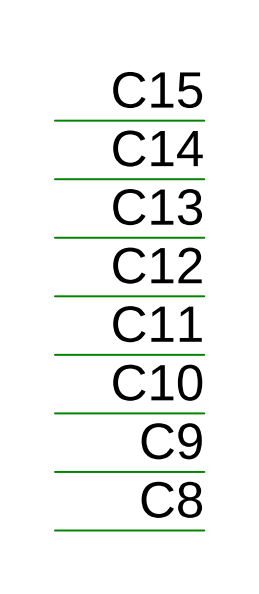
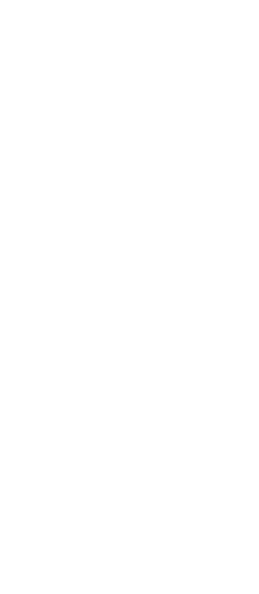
label: C15 (157, 90) -> none
wire: (54, 120) (204, 120) -> none
label: C14 (157, 148) -> none
wire: (54, 179) (204, 179) -> none
label: C13 (157, 207) -> none
wire: (54, 237) (204, 237) -> none
label: C12 (157, 265) -> none
wire: (54, 296) (204, 296) -> none
label: C11 (157, 324) -> none
wire: (54, 354) (204, 354) -> none
label: C10 (157, 382) -> none
wire: (54, 413) (204, 413) -> none
label: C9 (171, 441) -> none
wire: (54, 471) (204, 471) -> none
label: C8 (171, 499) -> none
wire: (54, 530) (204, 530) -> none

